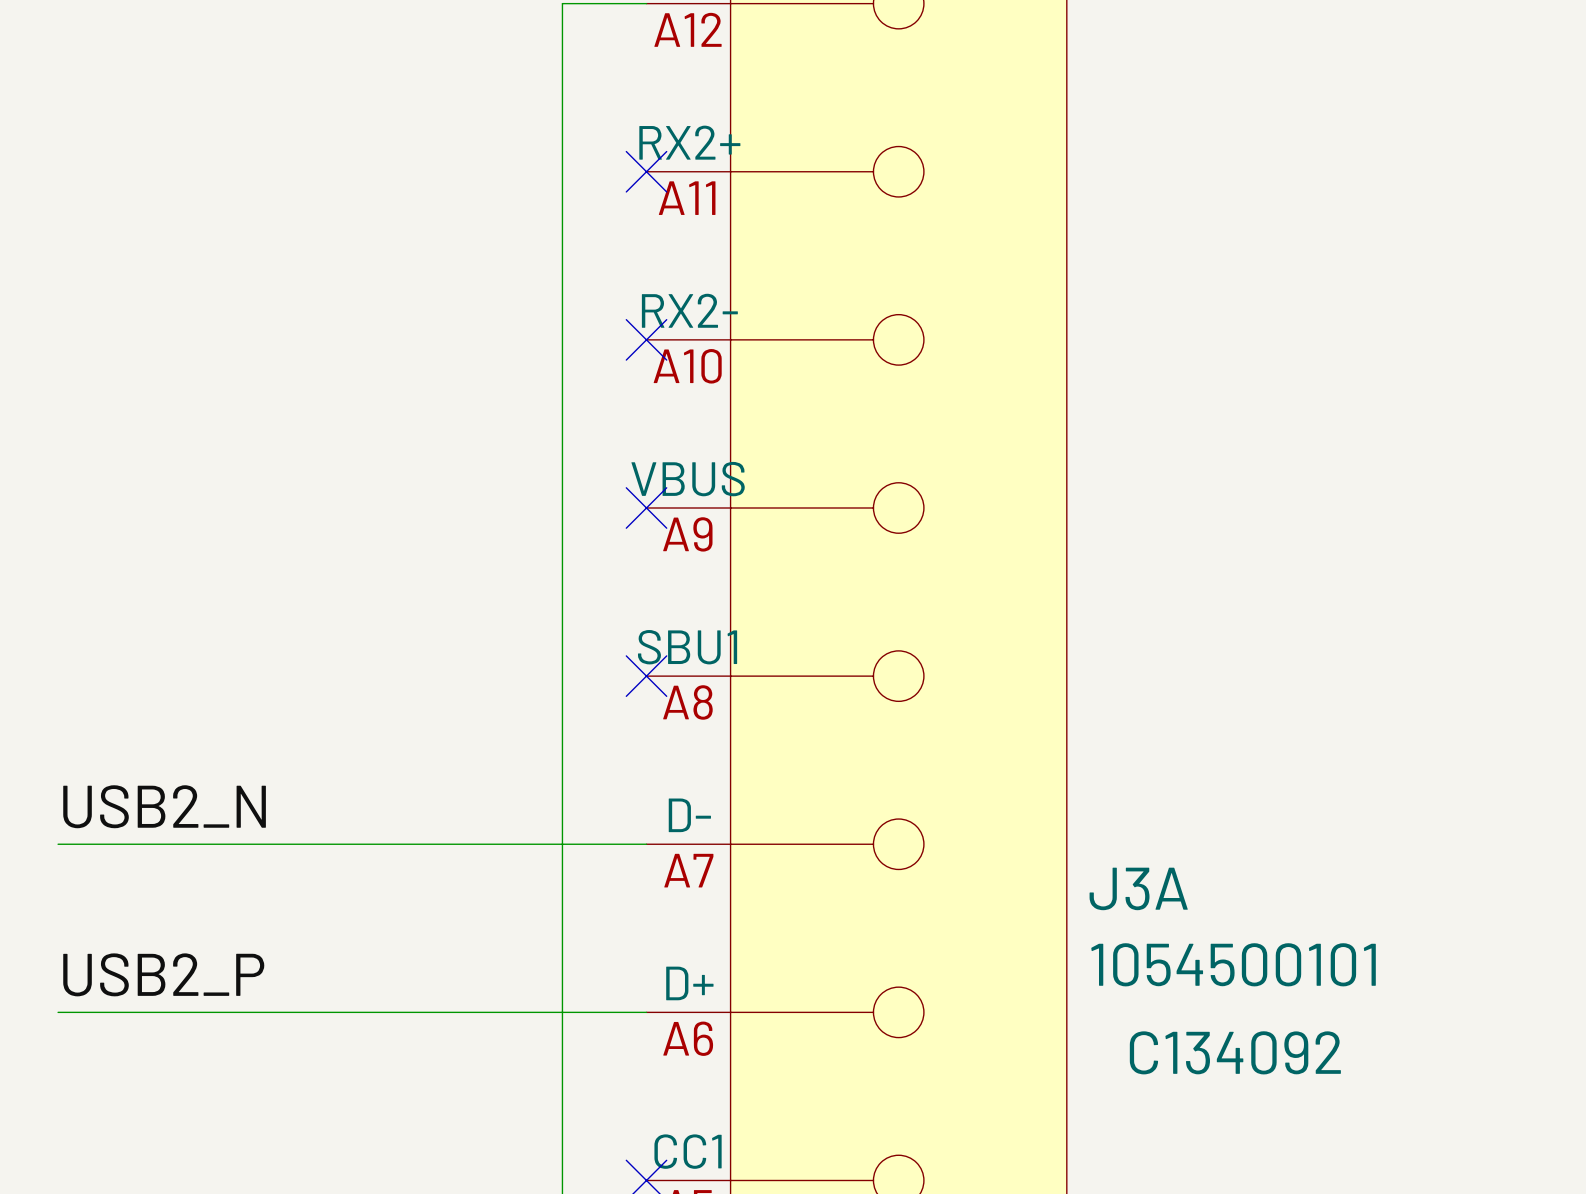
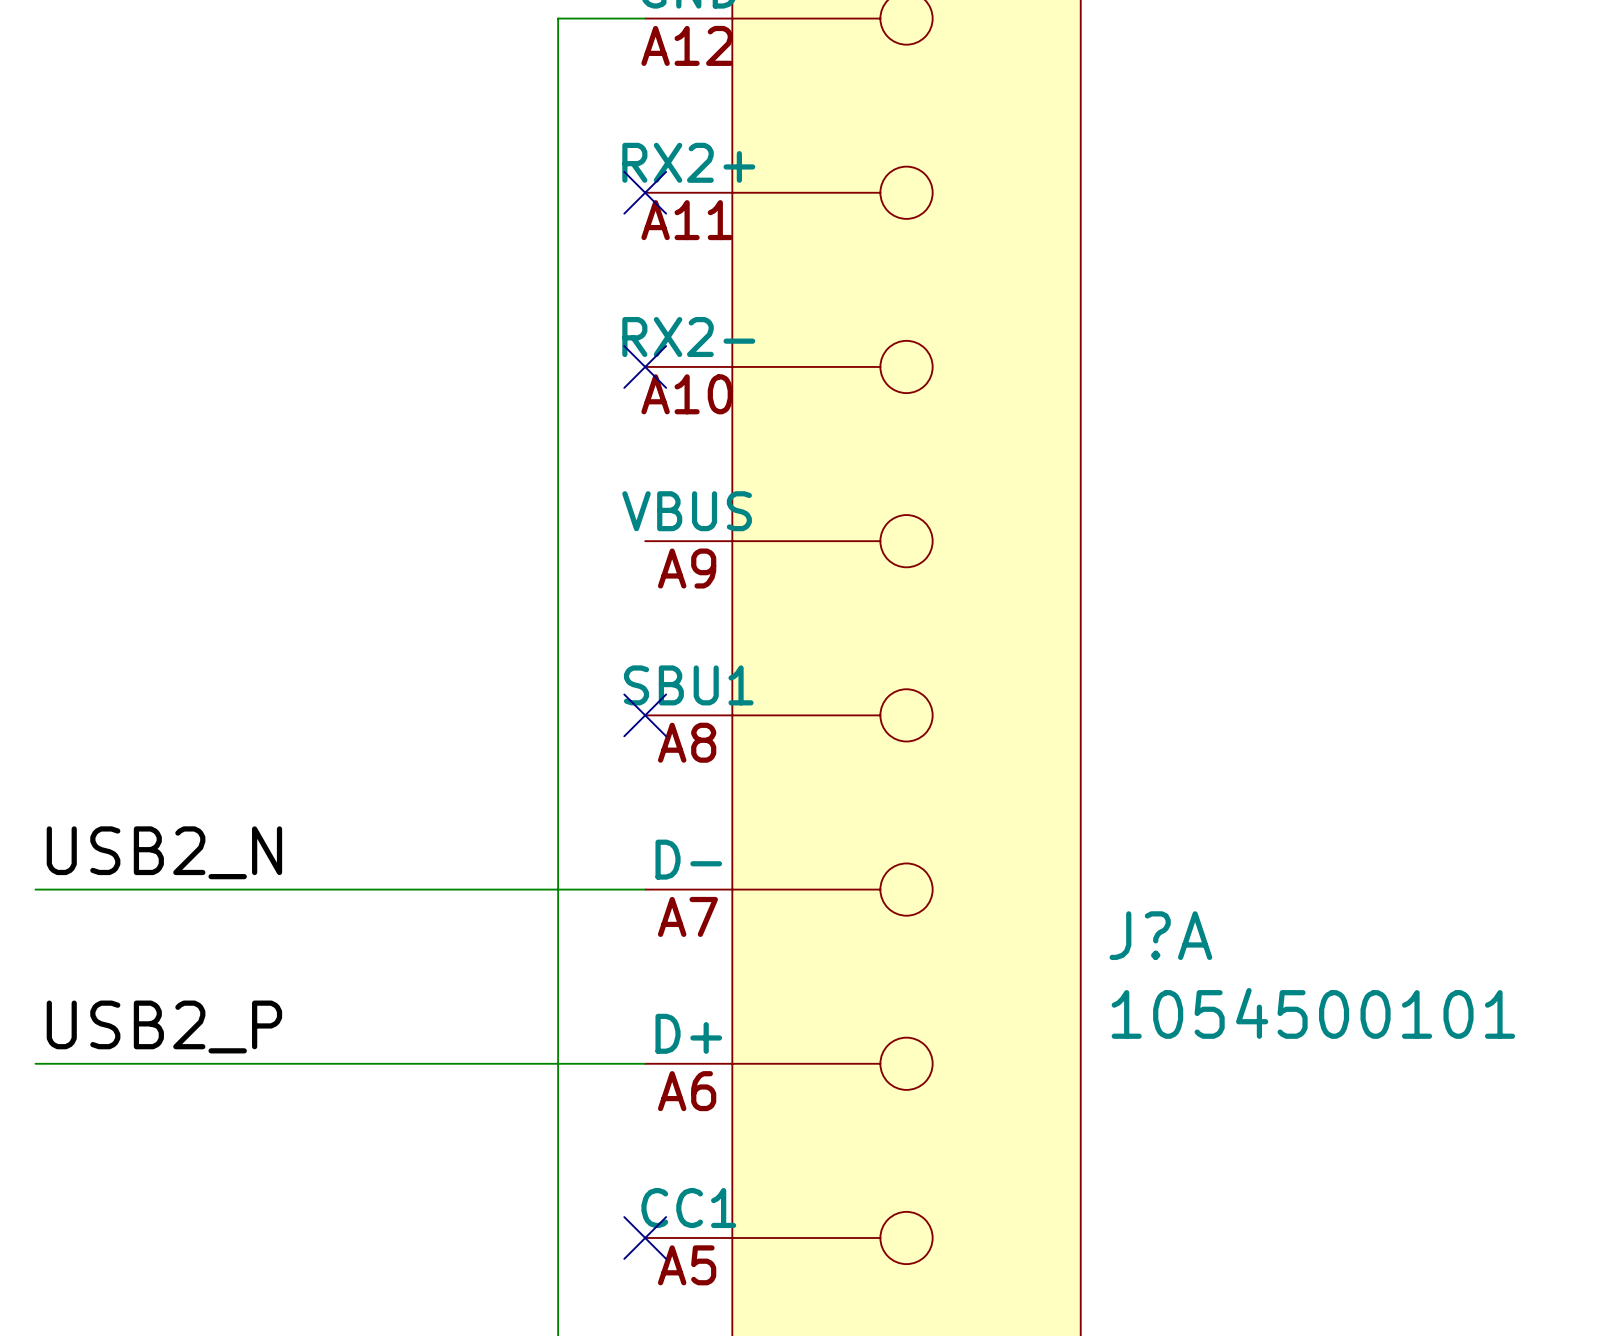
no-connect mark: (646, 508) -> none
J3A name: J3A (1138, 888) -> J?A (1160, 935)
J3A text: C134092 (1235, 1052) -> none

